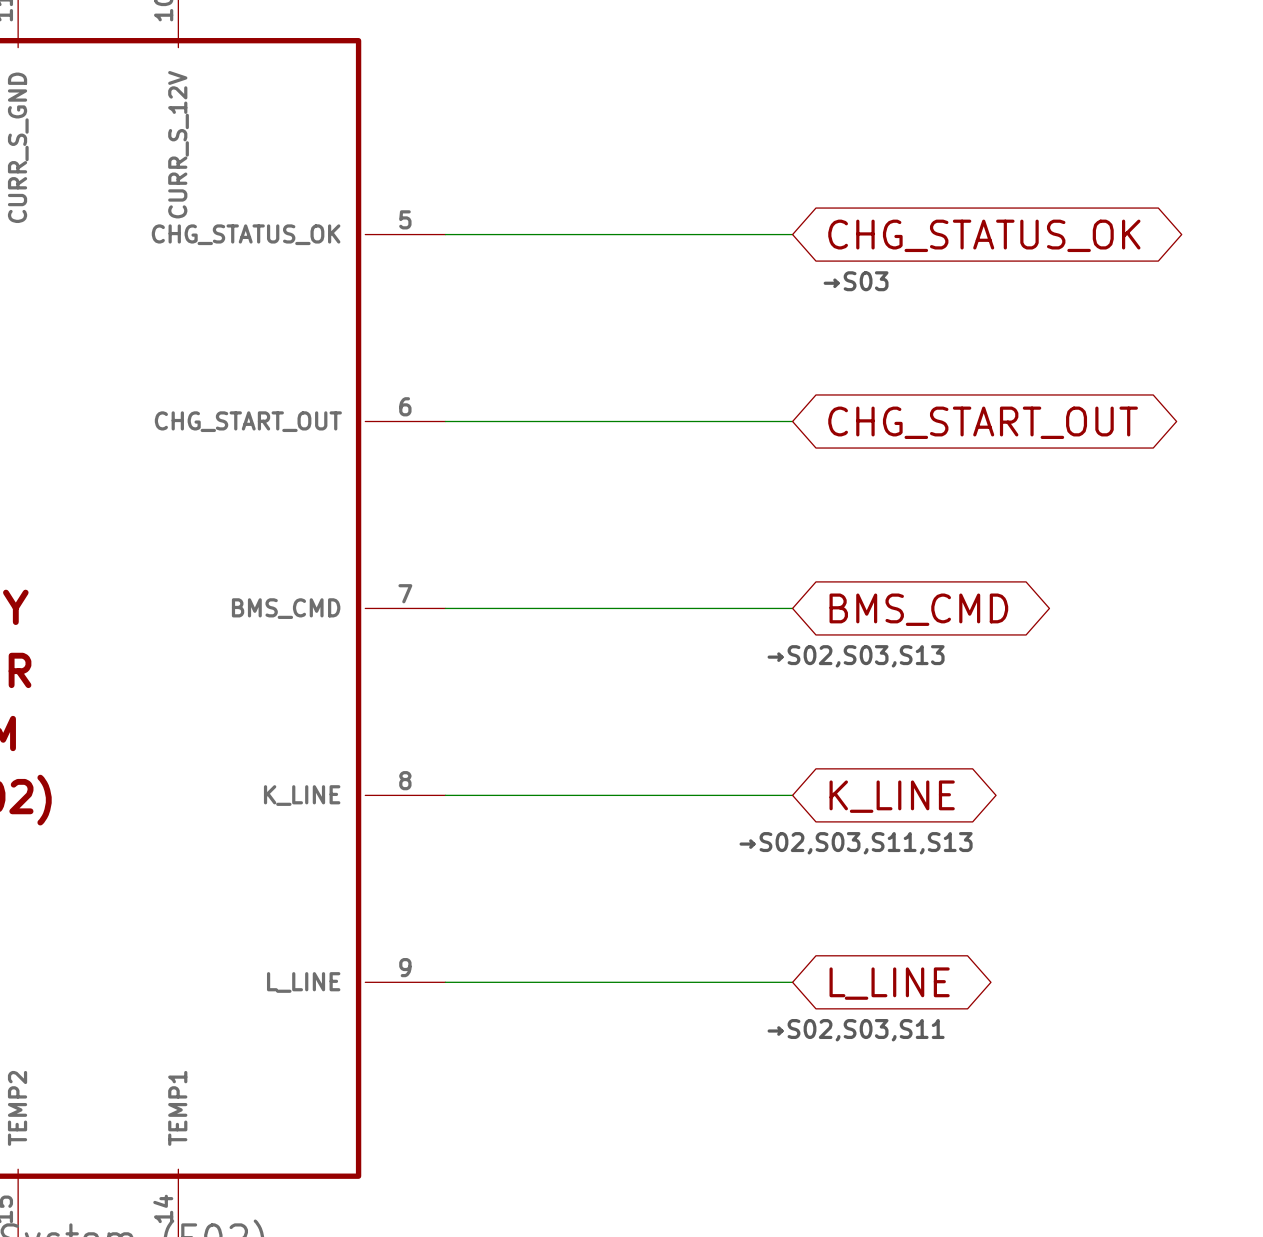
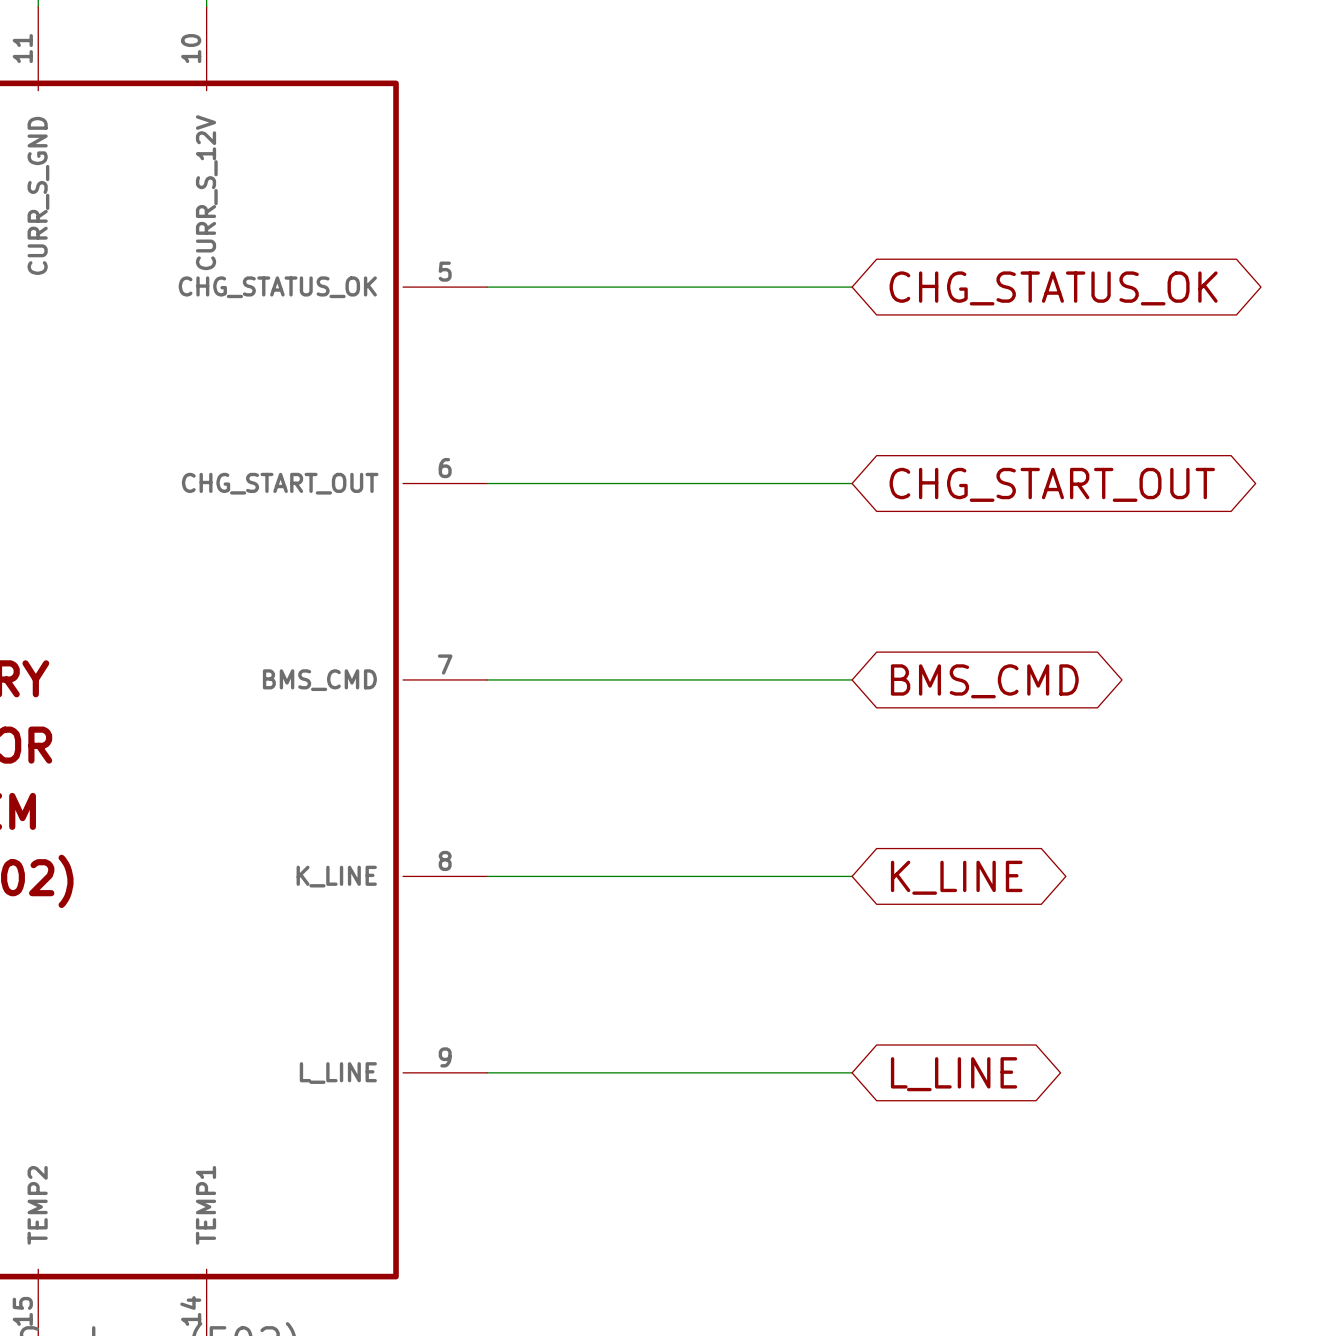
text: →S03 (856, 281) -> none
text: →S02,S03,S13 (856, 656) -> none
text: →S02,S03,S11,S13 (856, 843) -> none
text: →S02,S03,S11 (856, 1030) -> none

